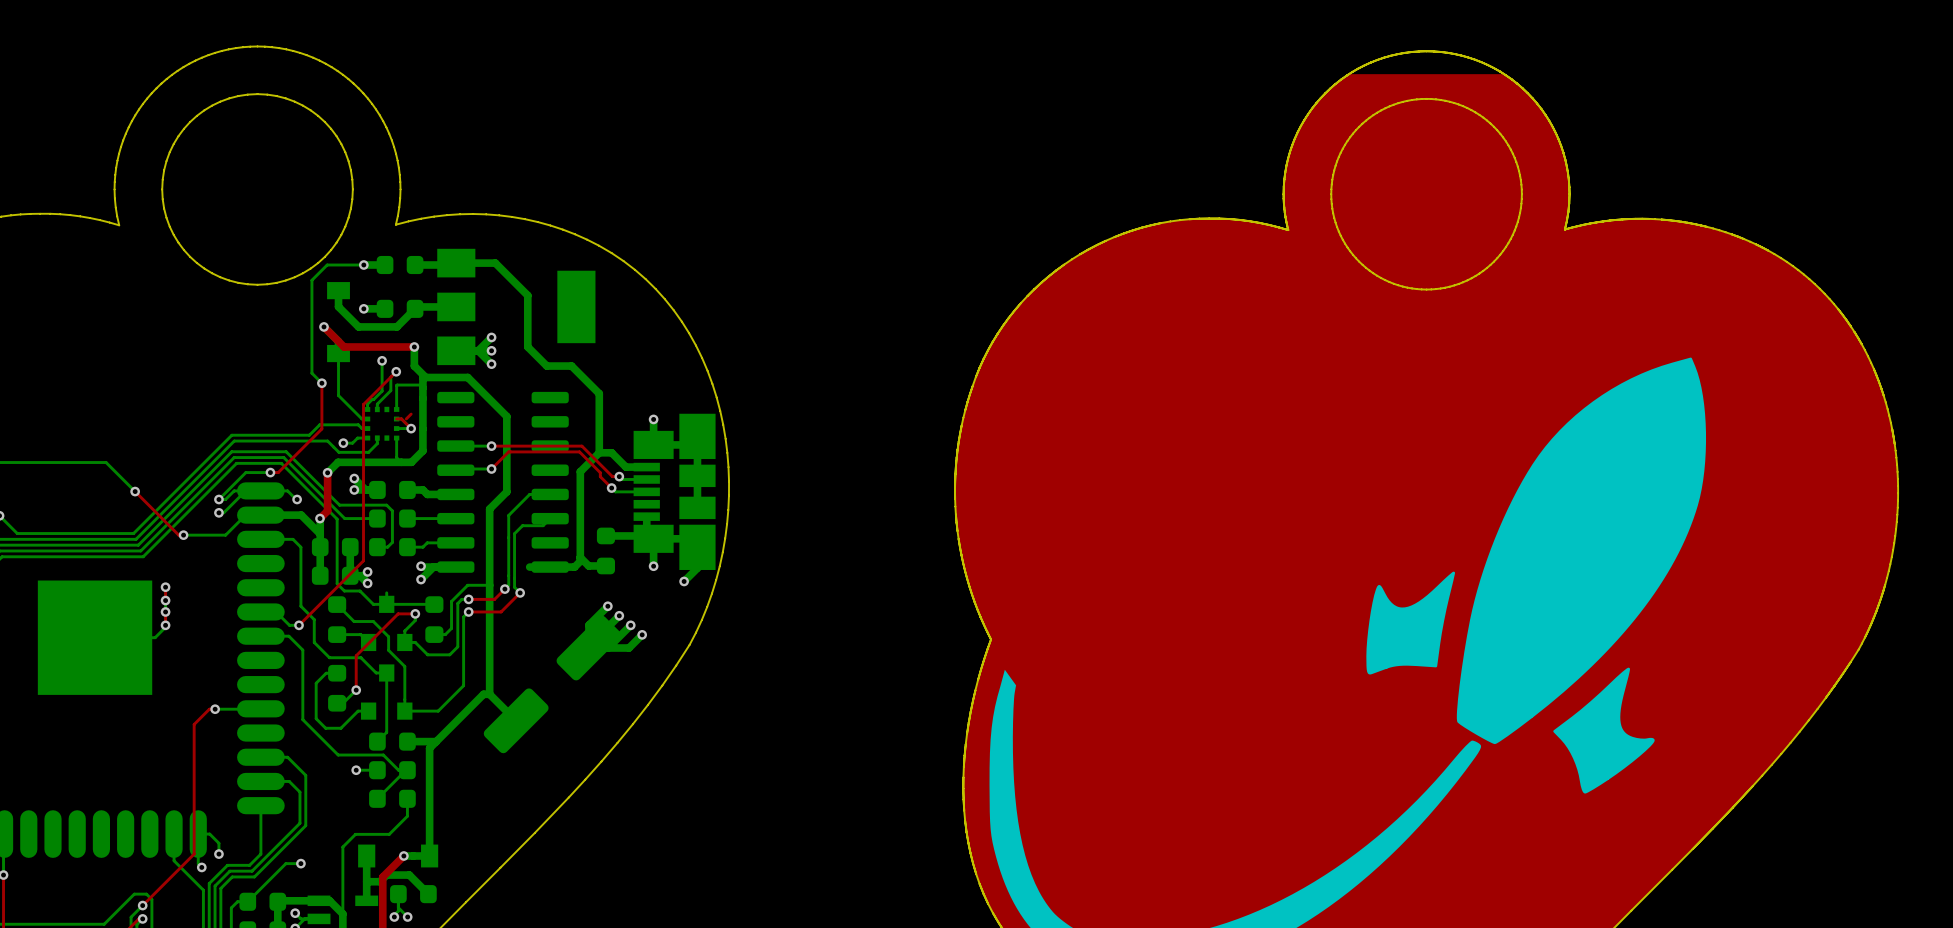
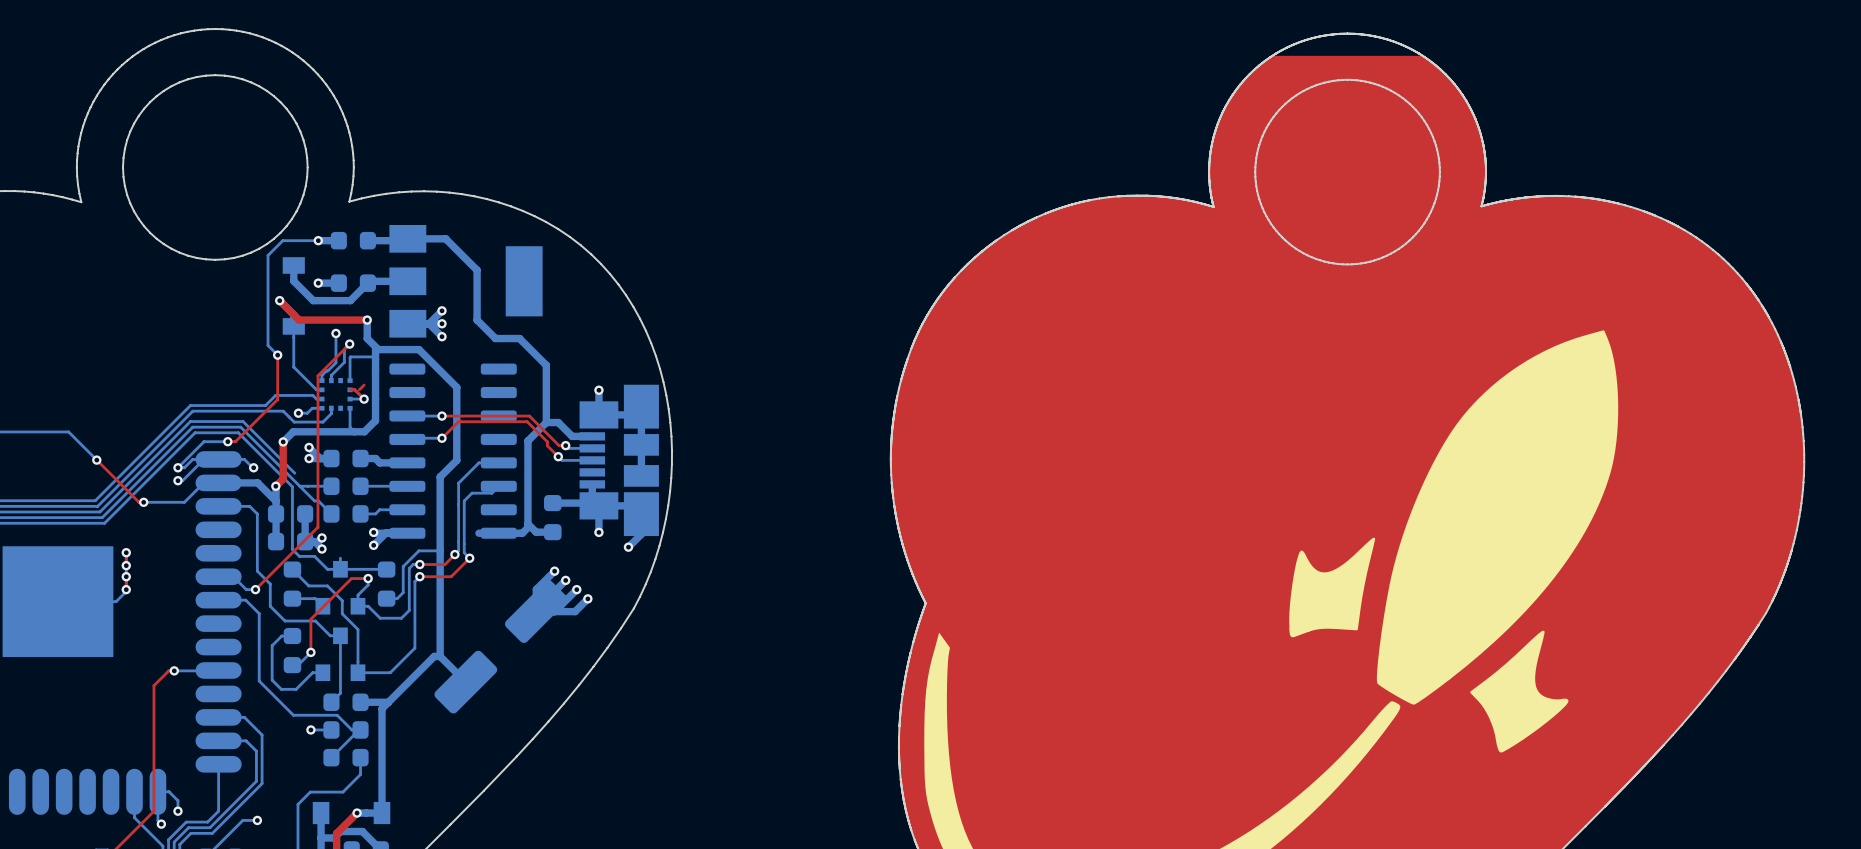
bottom track: (339, 505) (386, 505) (392, 510) (392, 542) (387, 547) (377, 547) -> (299, 486) (331, 513)

